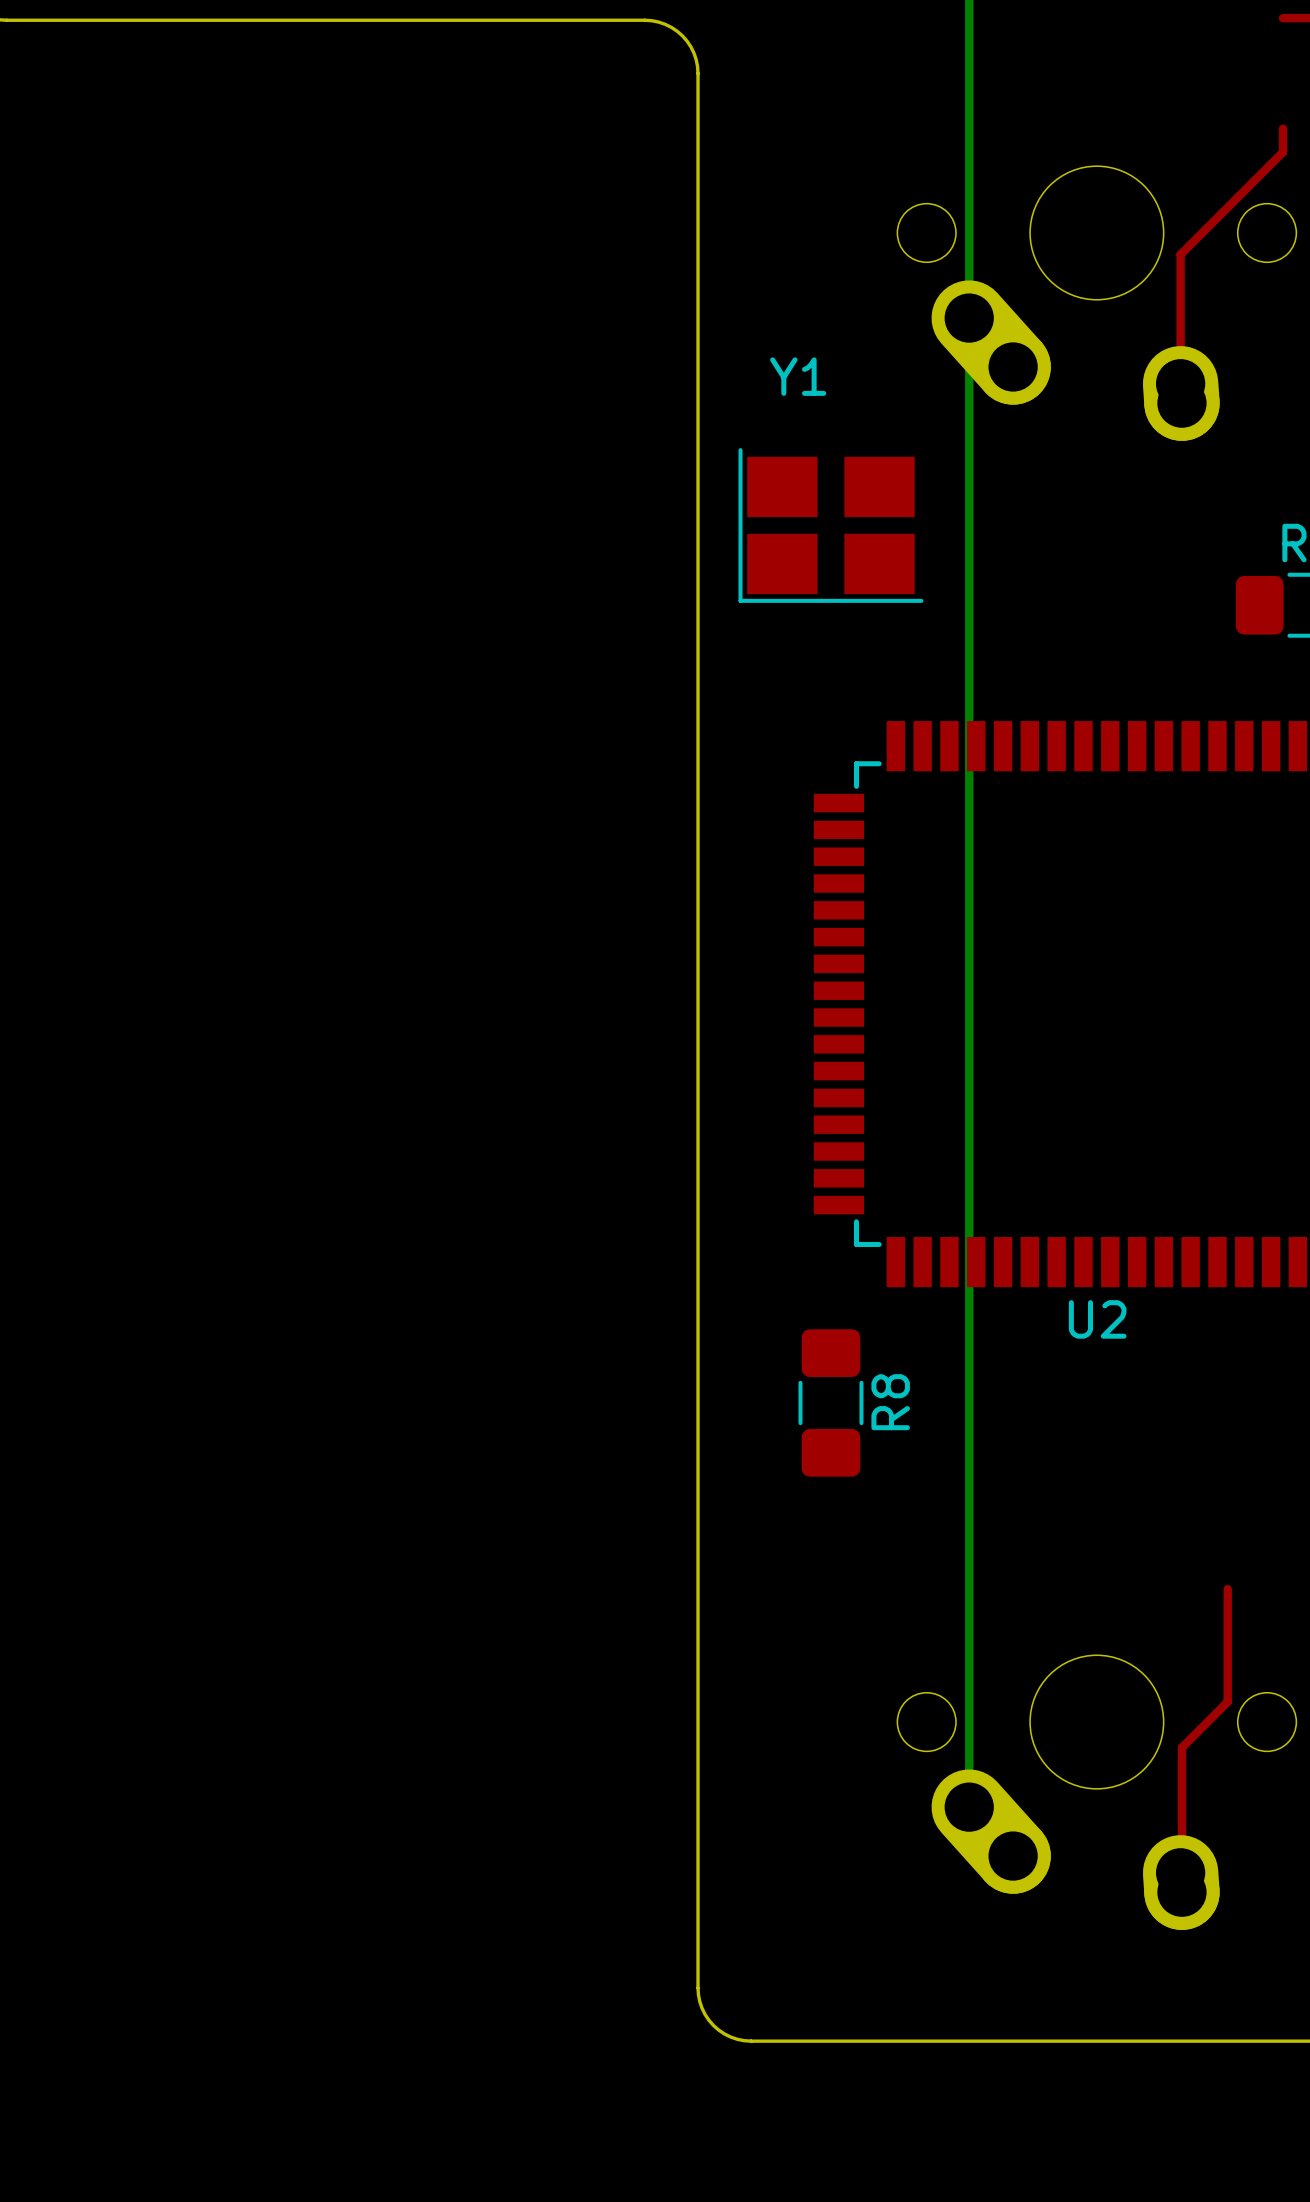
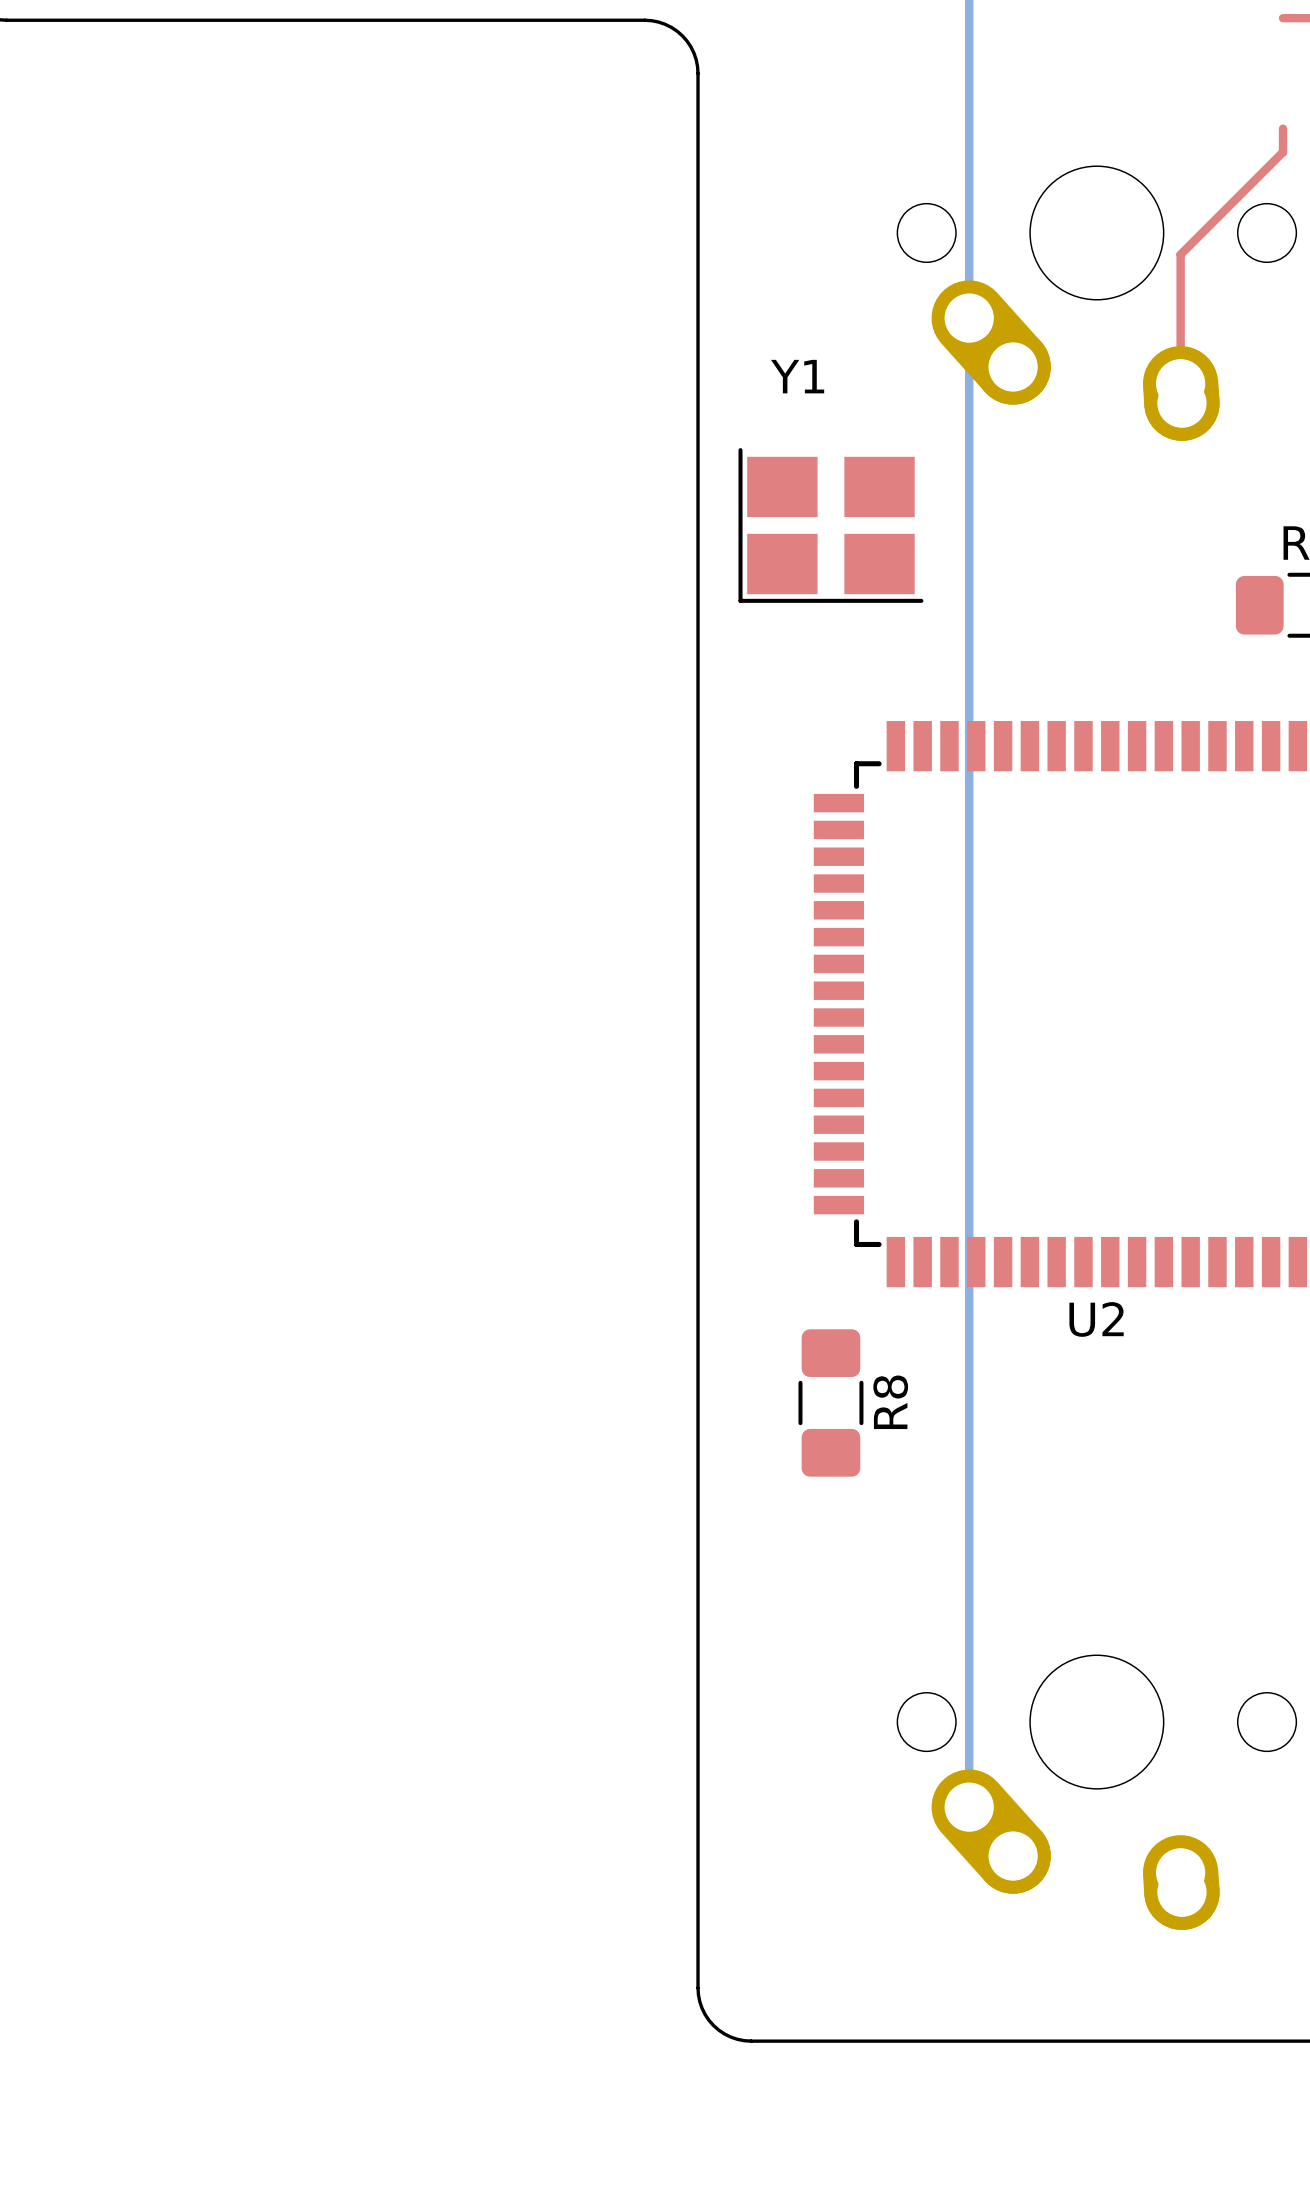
top track: (1227, 1589) (1227, 1701) (1181, 1747) (1181, 1892) -> none

